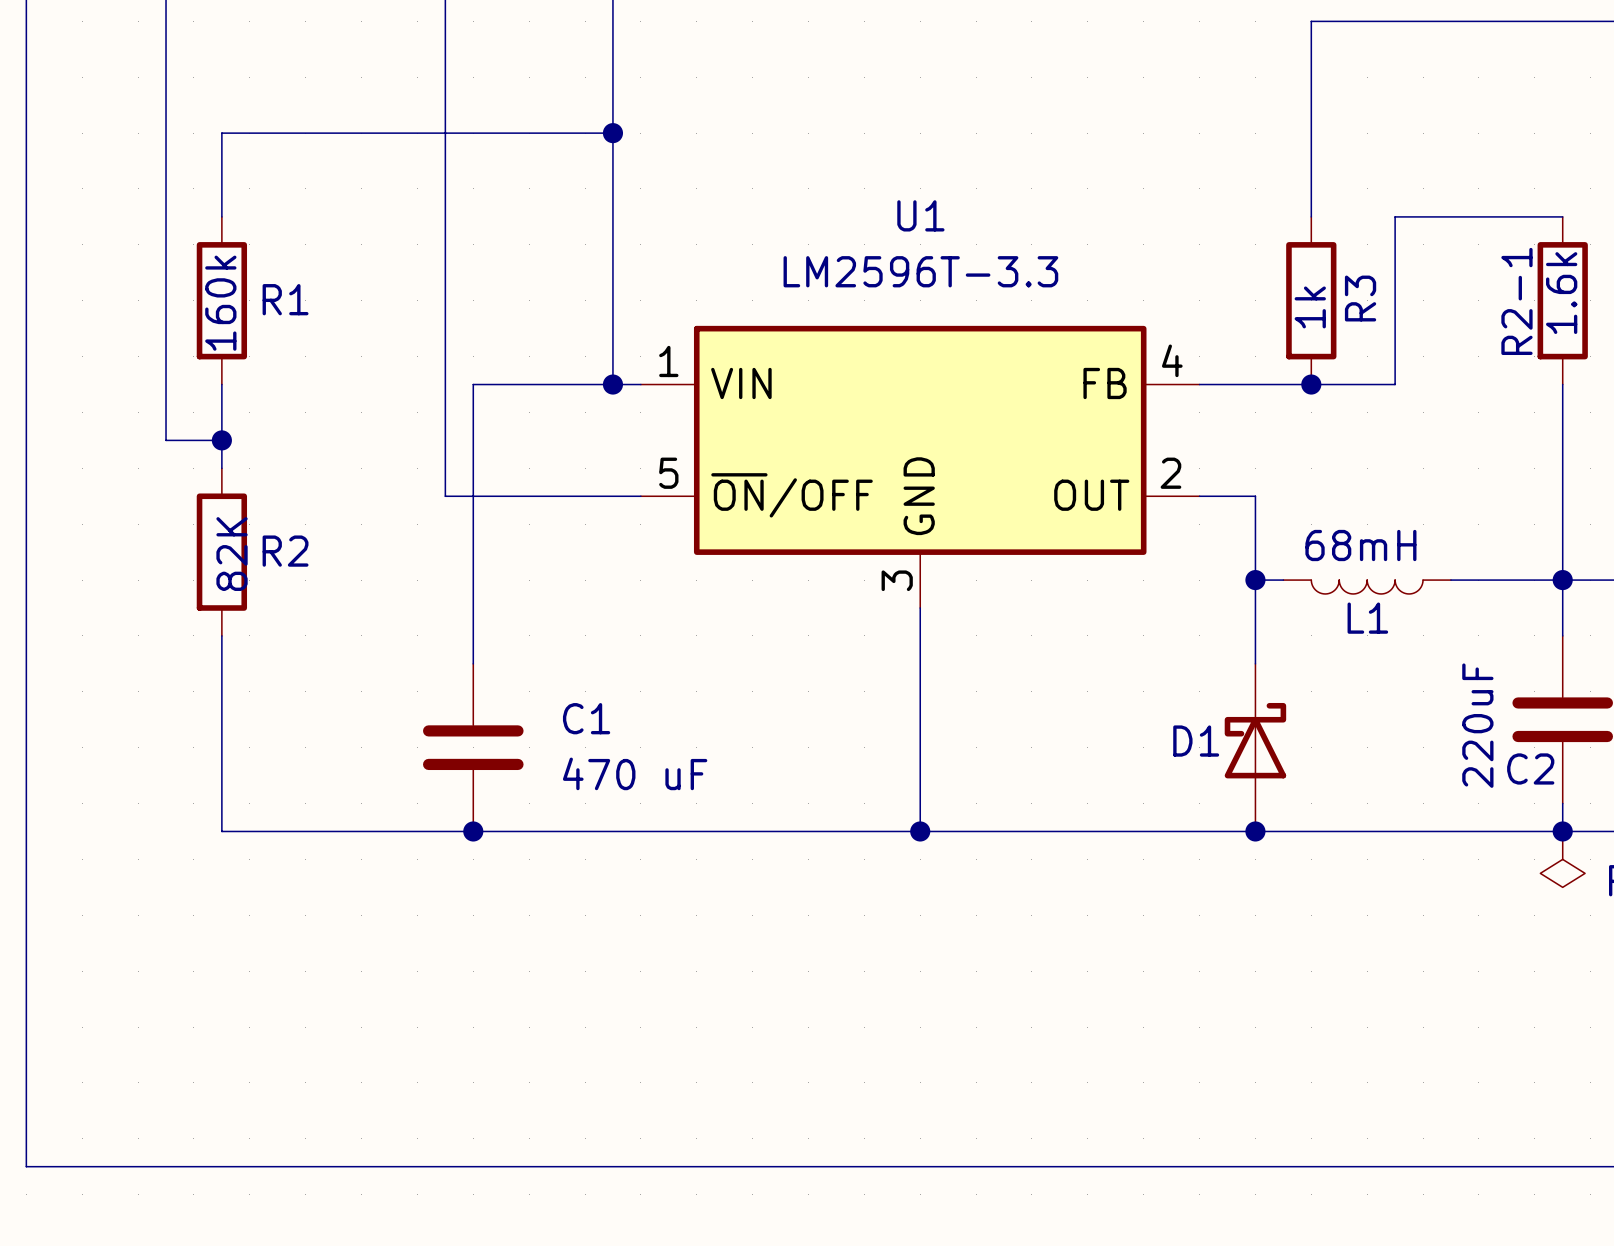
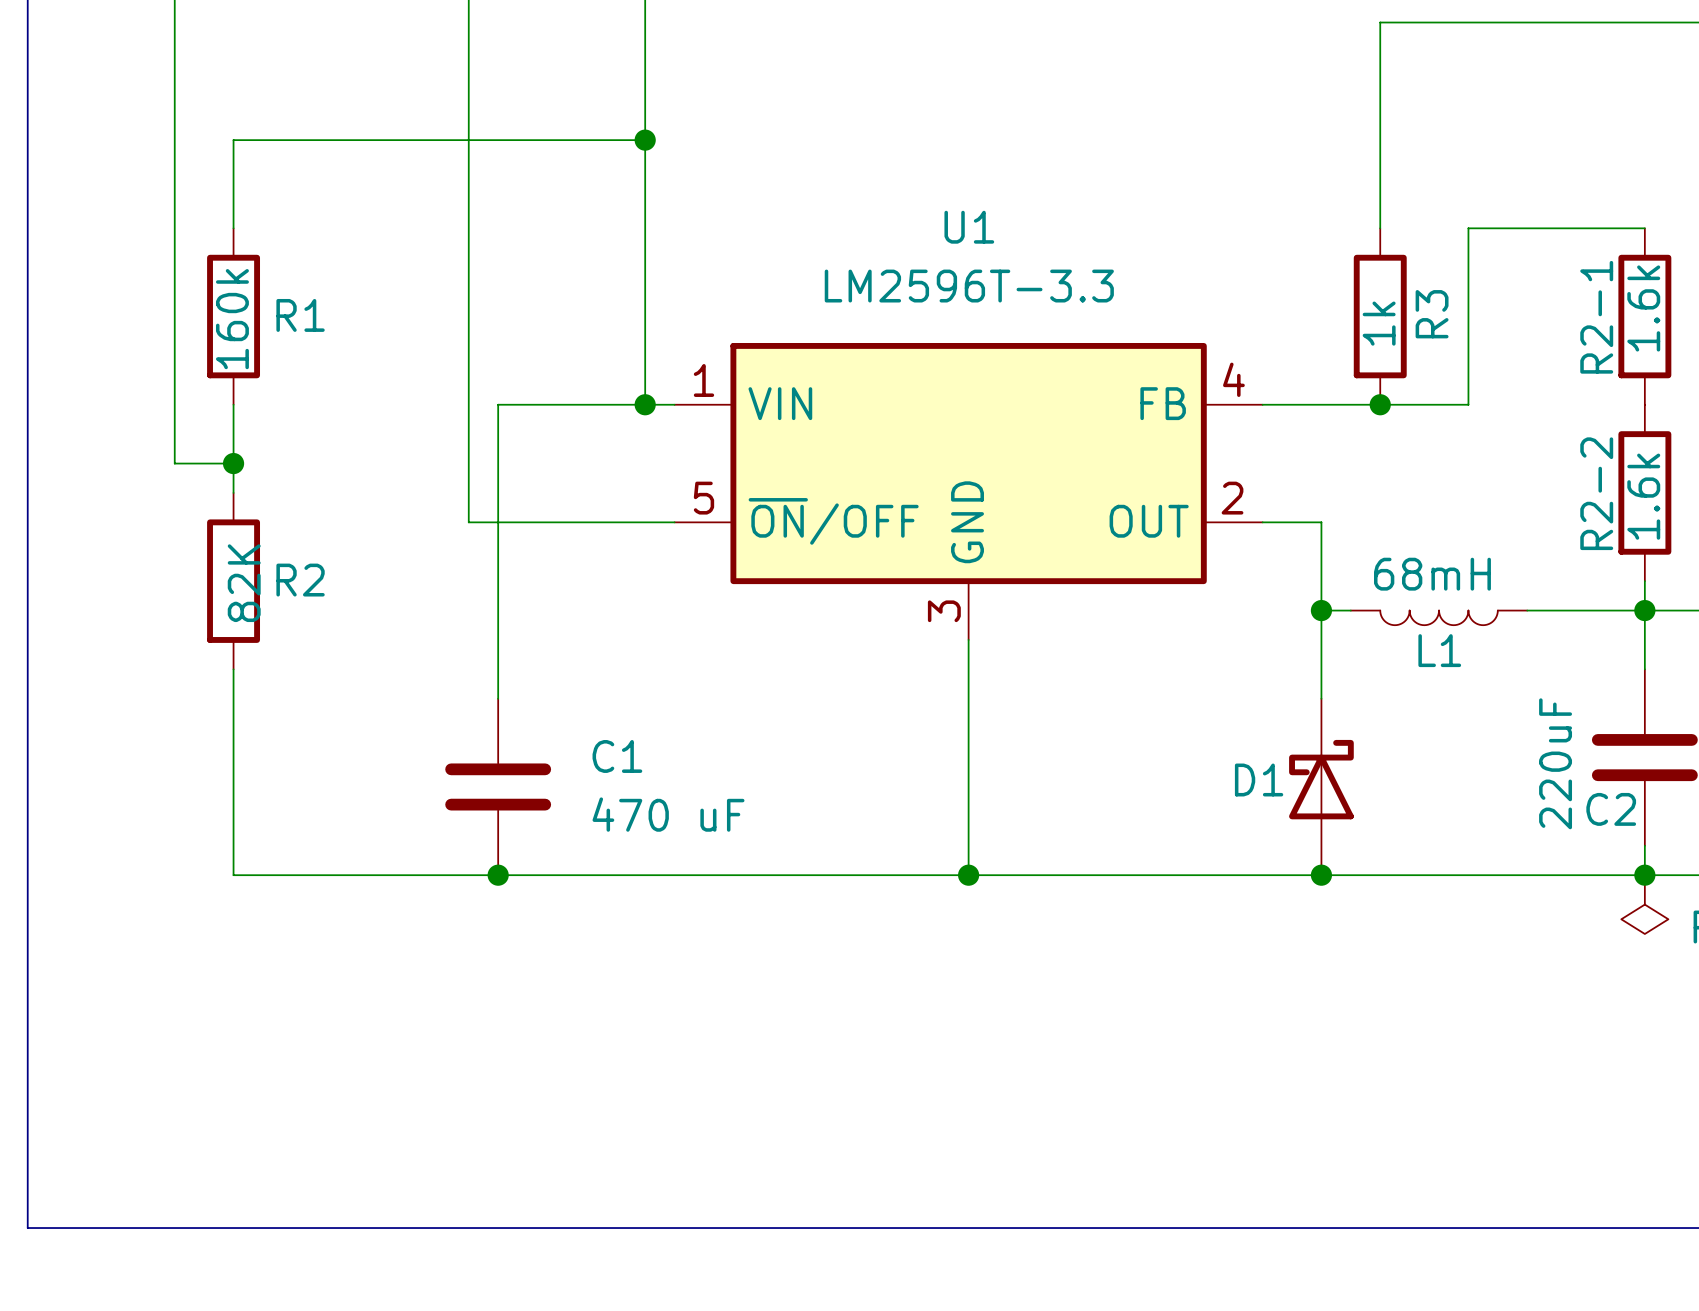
wire: (1562, 384) (1562, 552) -> none
R2-2: none -> 1.6k (1644, 492)

